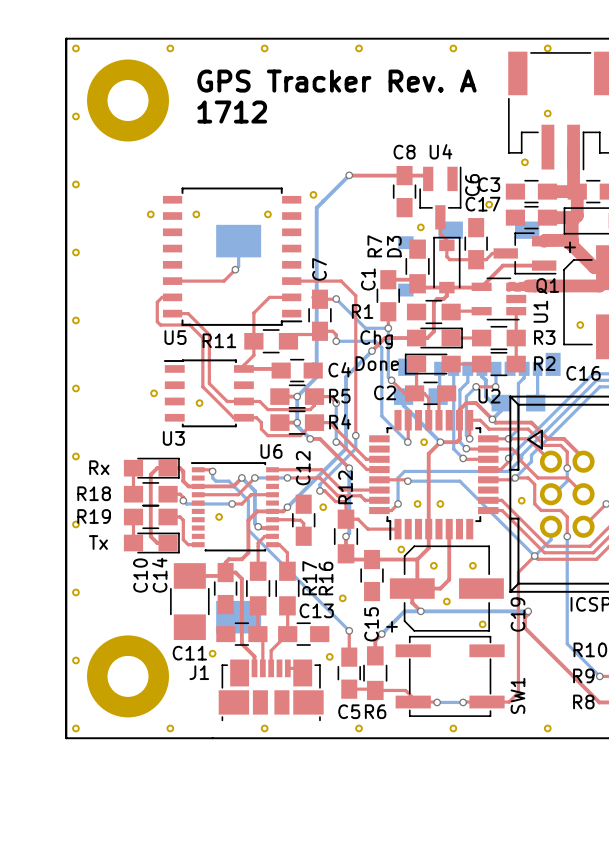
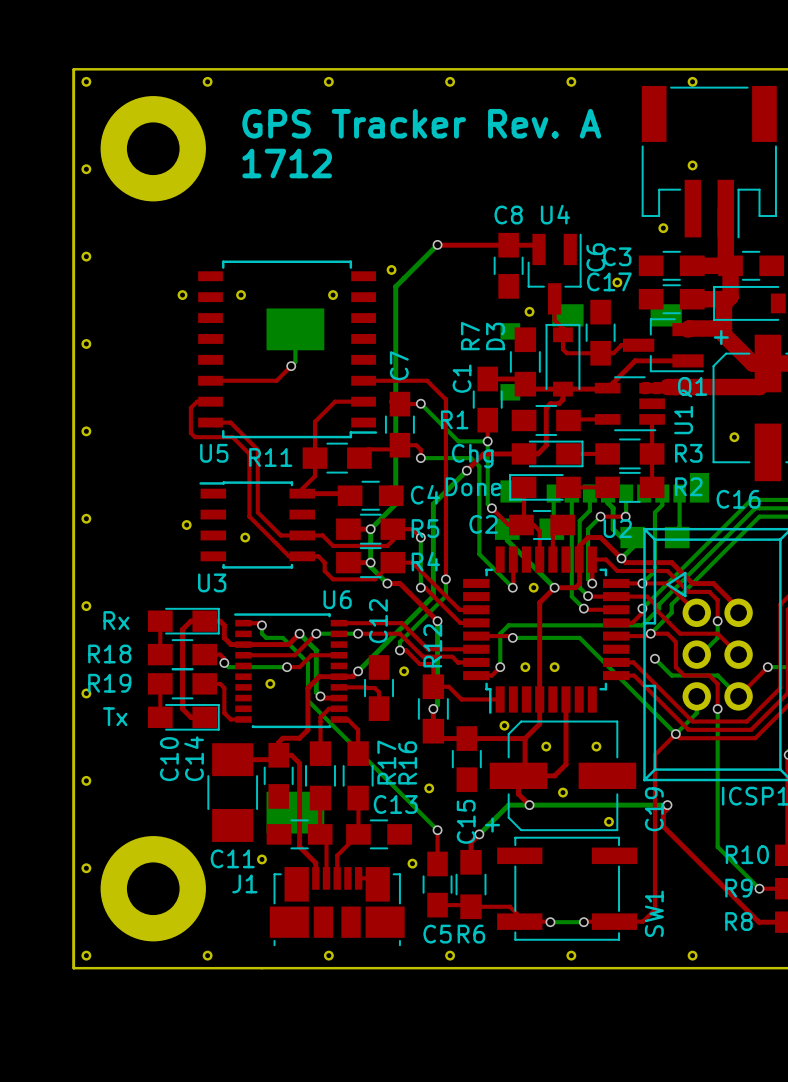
bottom track: none -> (654, 658) (671, 675) (717, 675) (738, 696)
via: none -> (654, 658)
part: (521, 500) -> none

